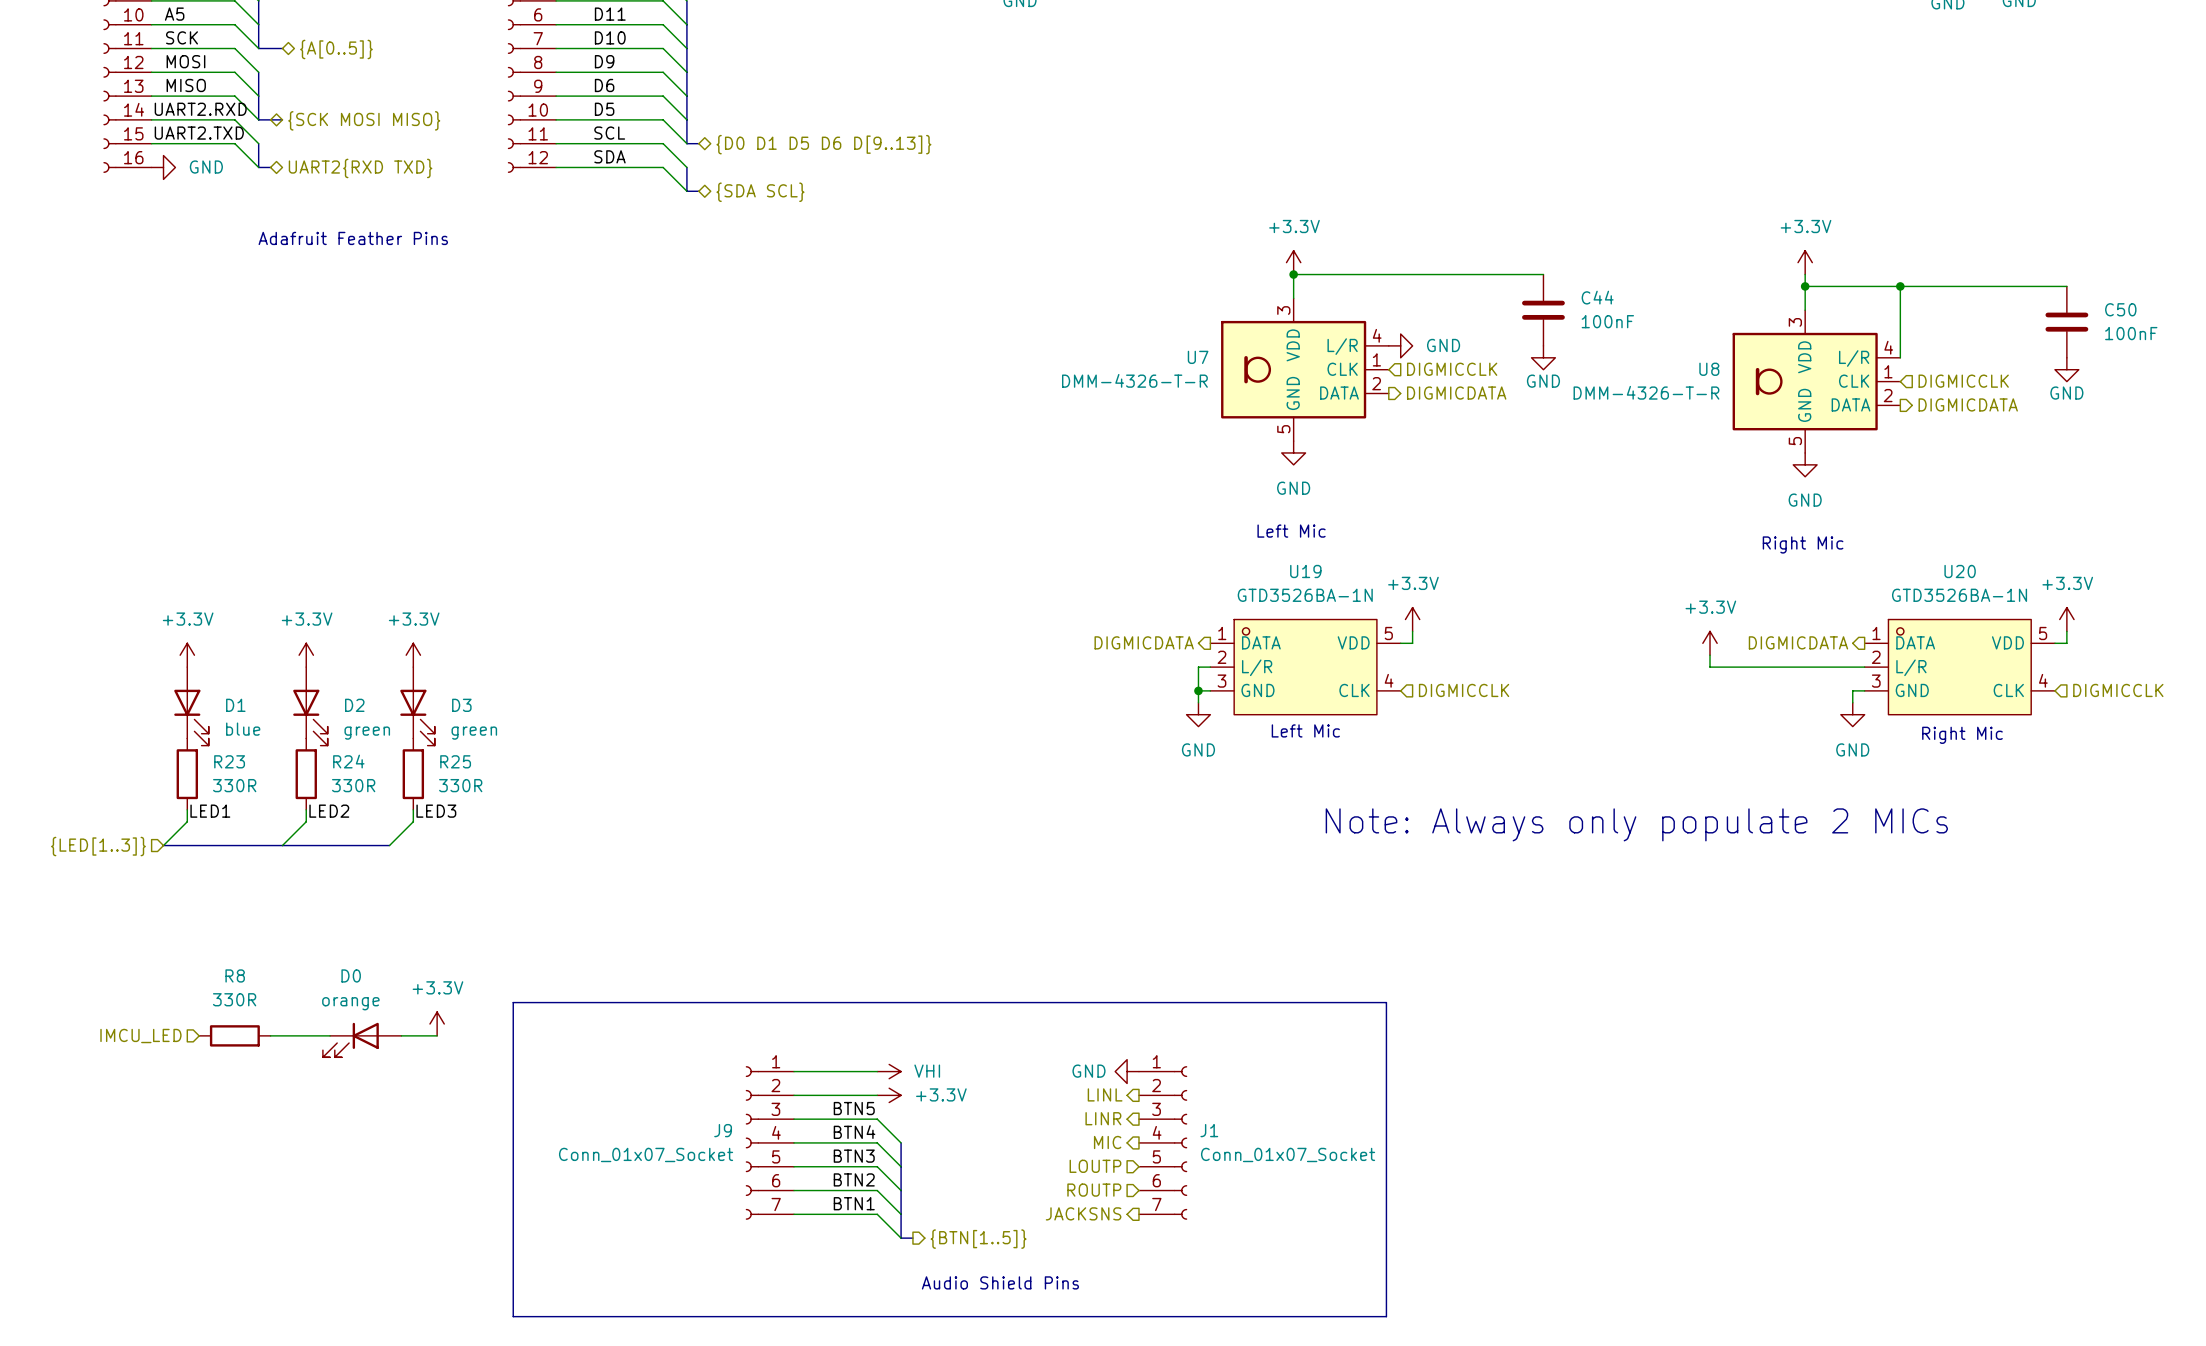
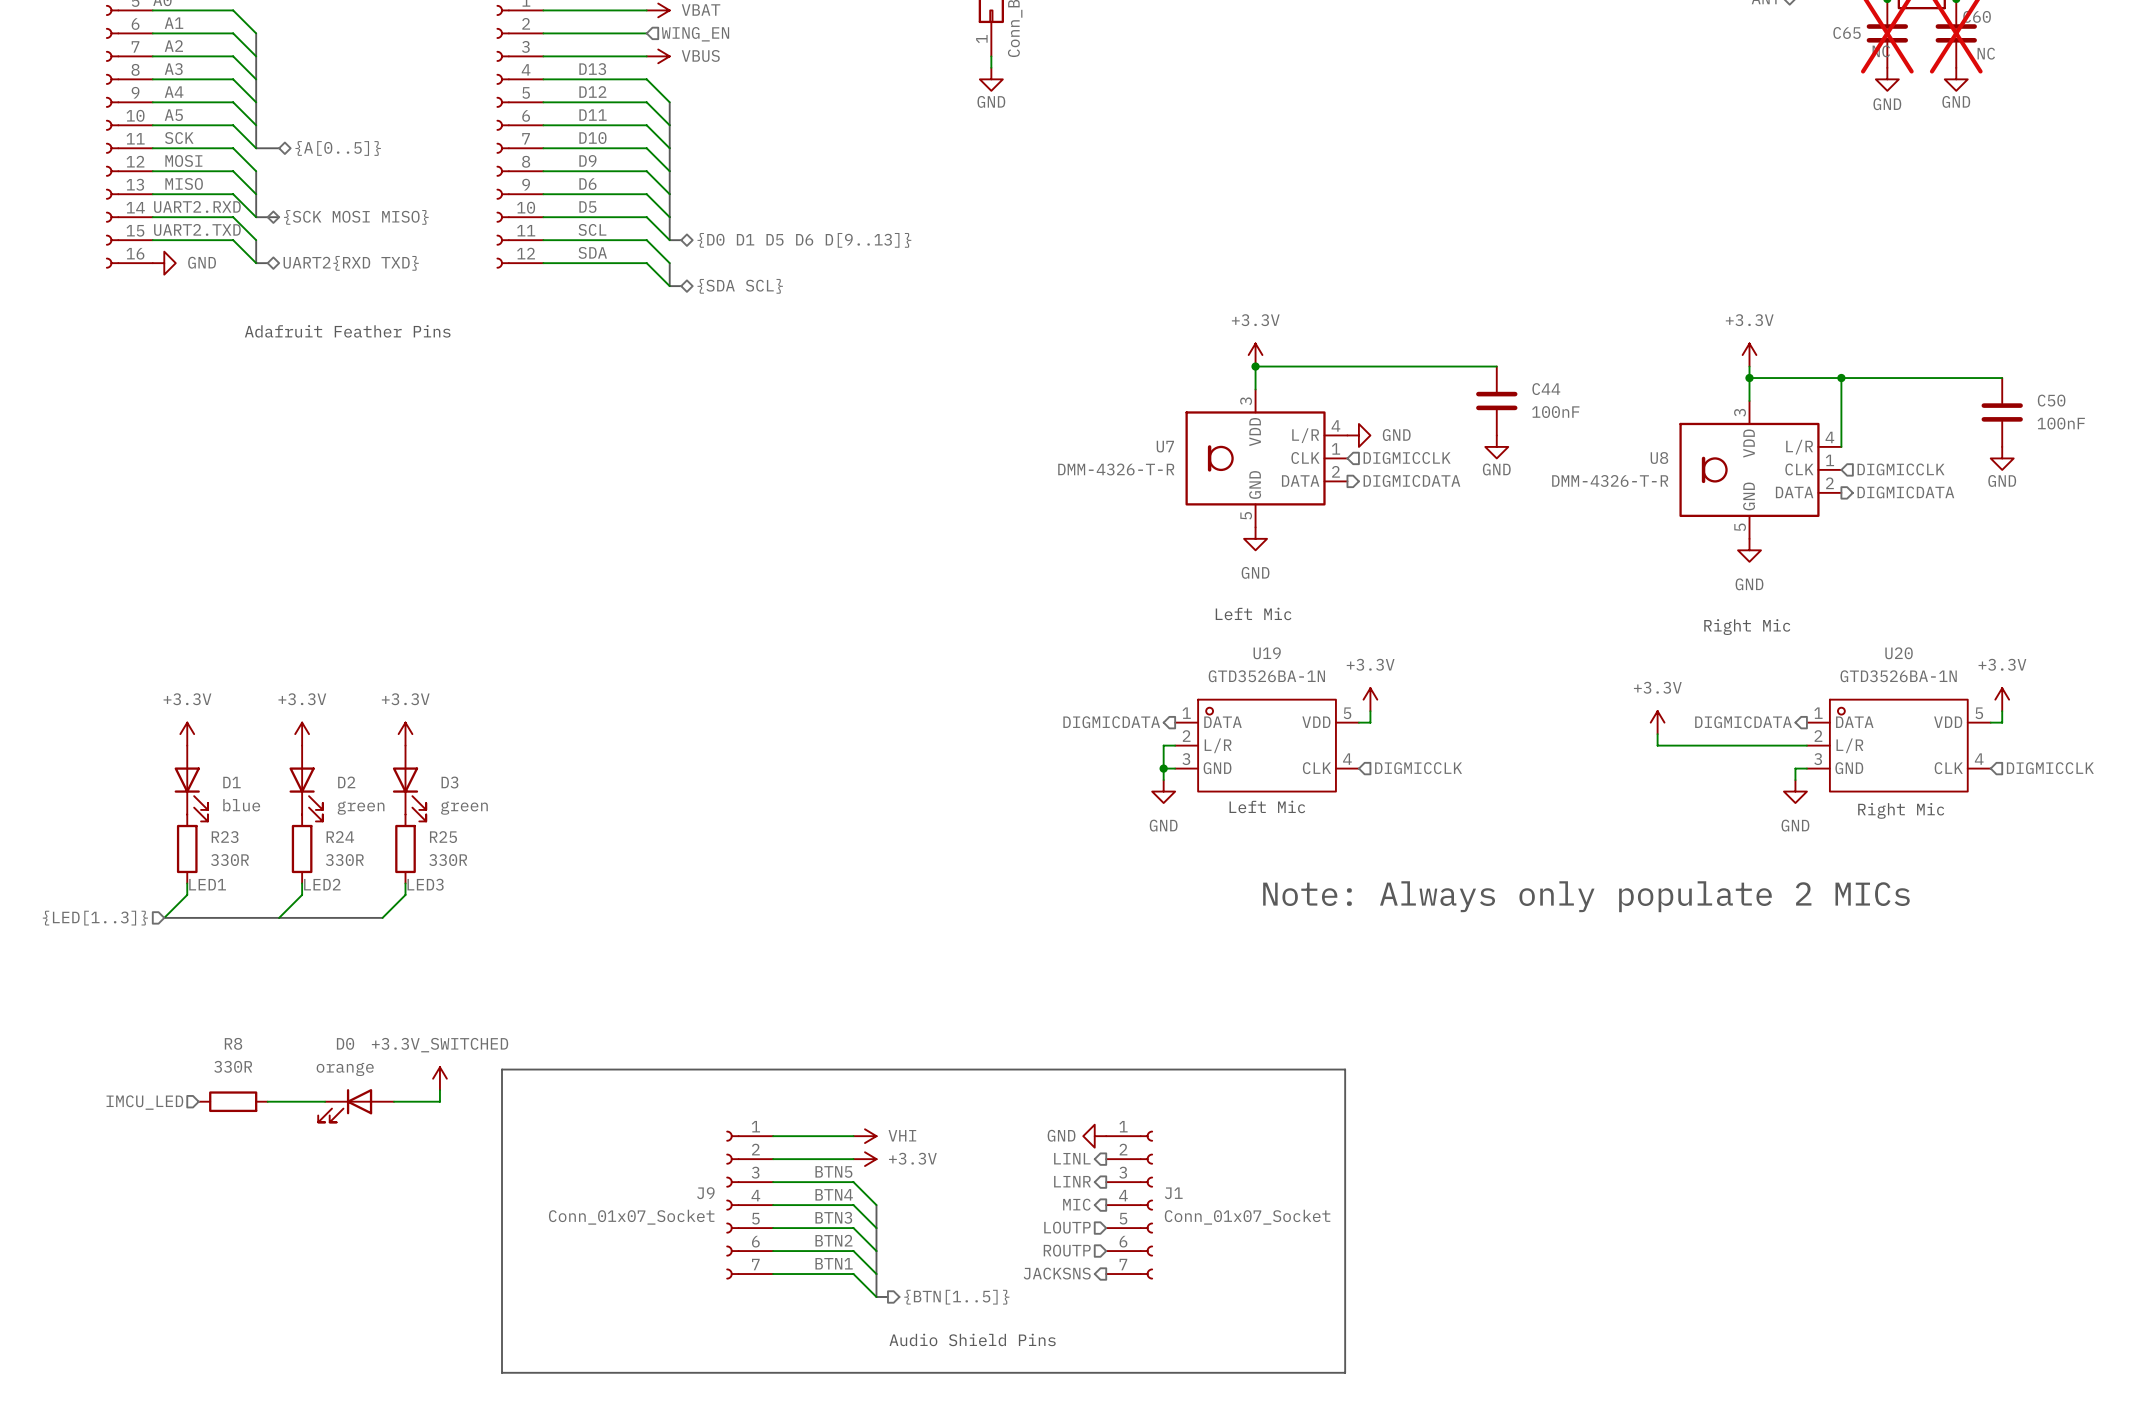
power symbol: none -> +3.3V_SWITCHED (439, 1078)
power symbol: +3.3V (437, 1023) -> none
wire: none -> (439, 1090) (439, 1101) (428, 1101)

